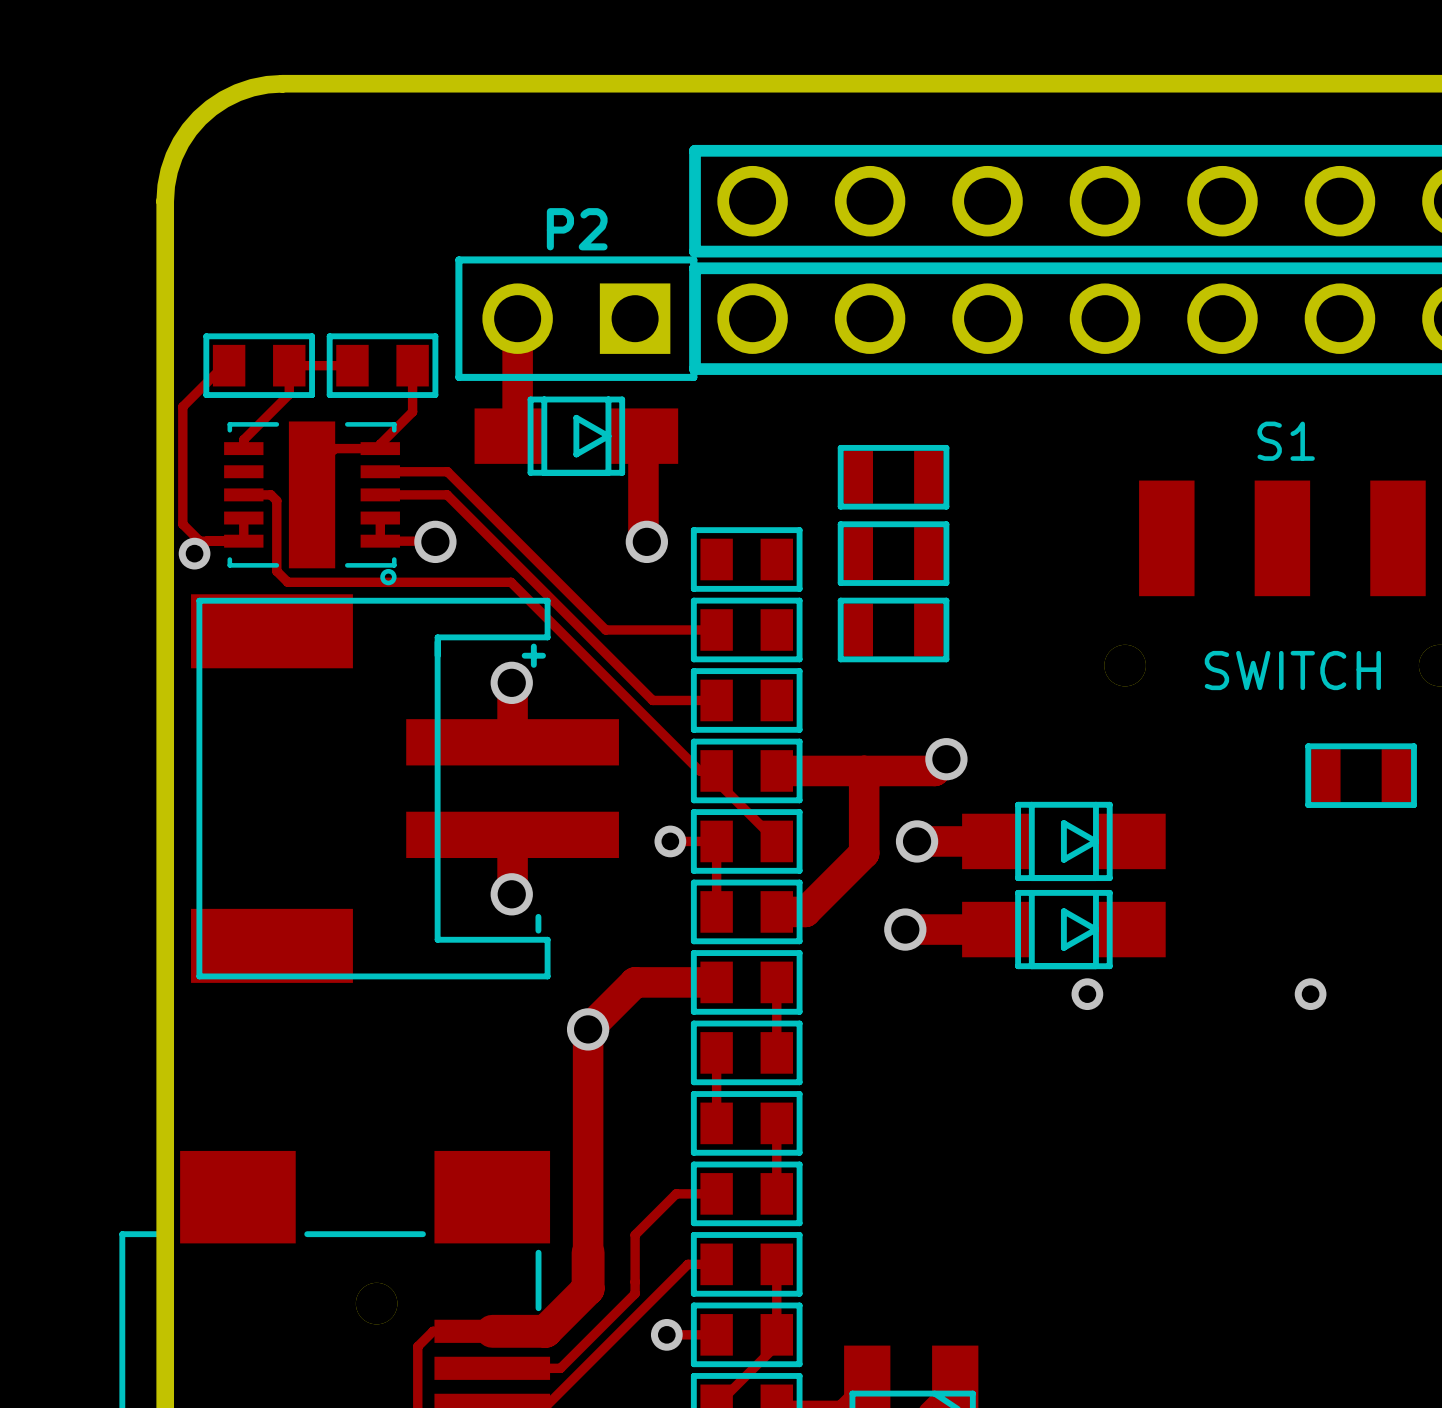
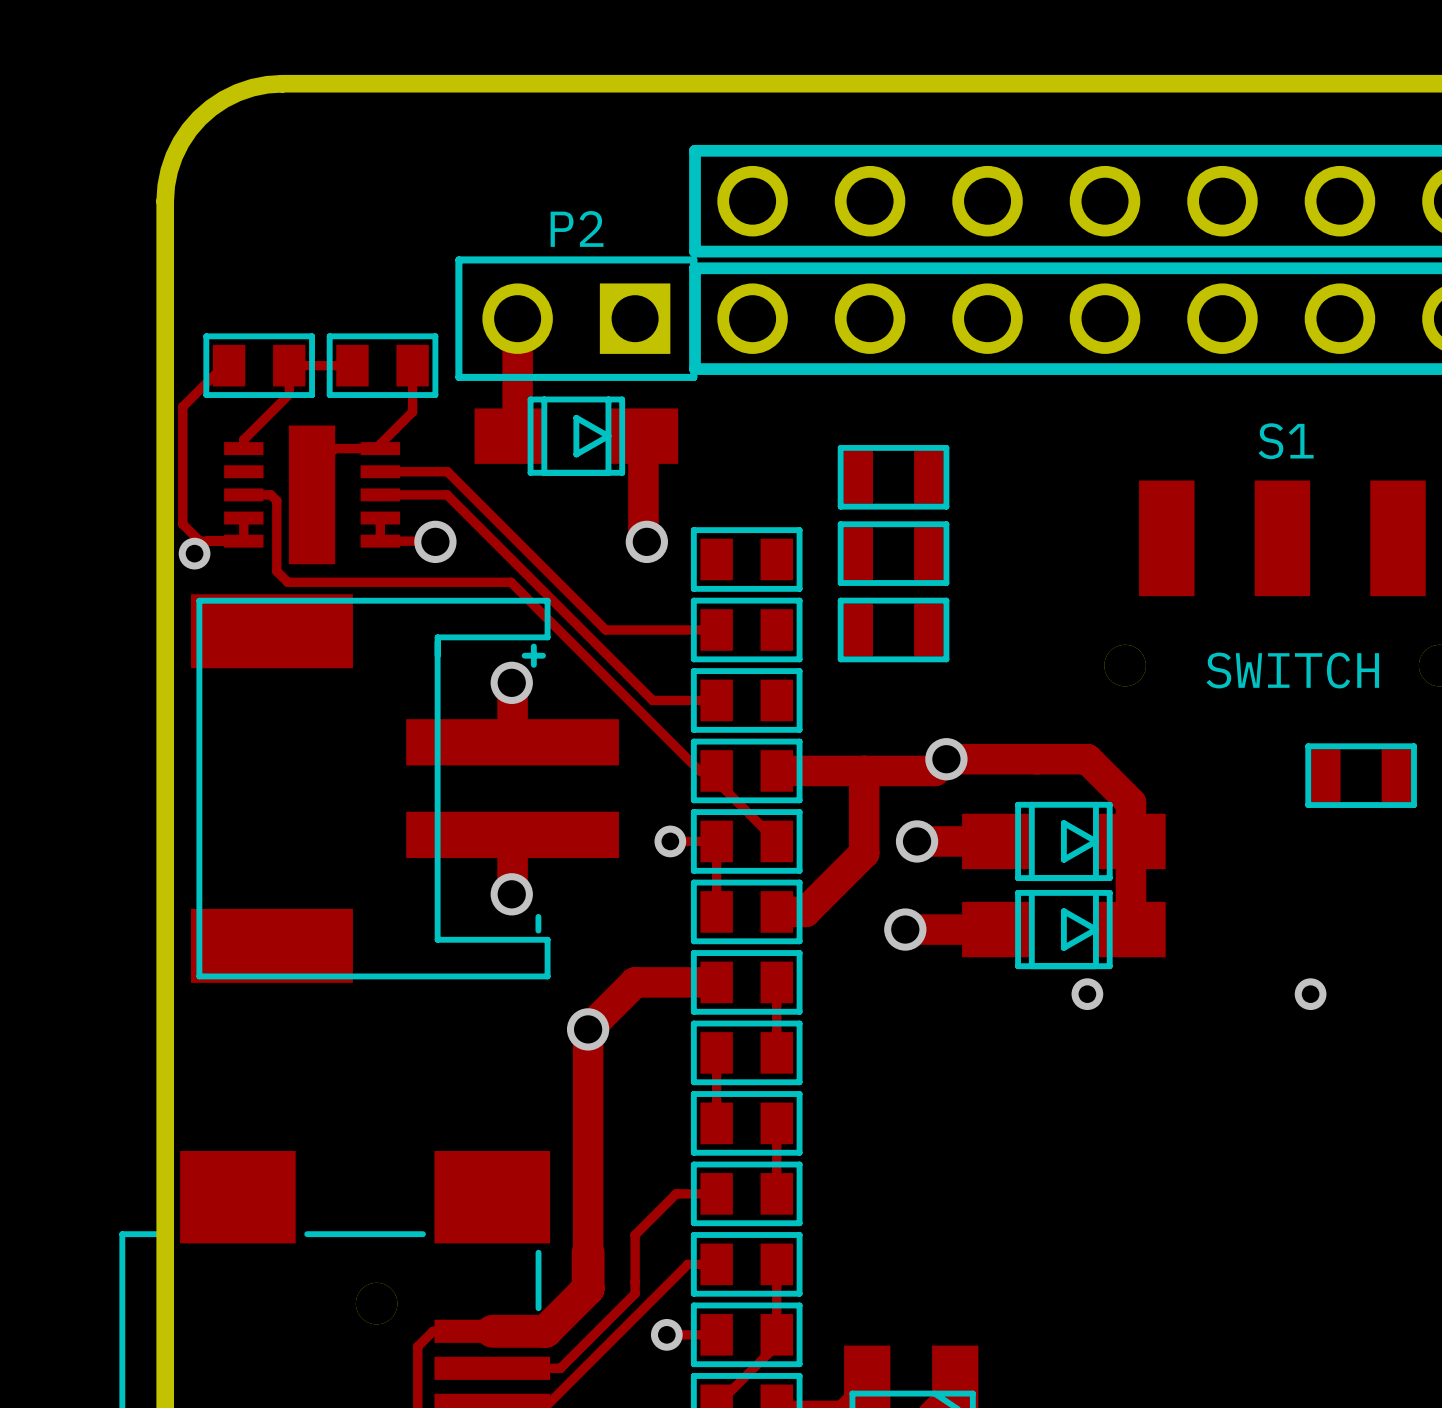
part footprint: [224, 421, 400, 586] -> [224, 425, 400, 565]
track: none -> (946, 759) (1087, 759) (1130, 802) (1130, 929)

